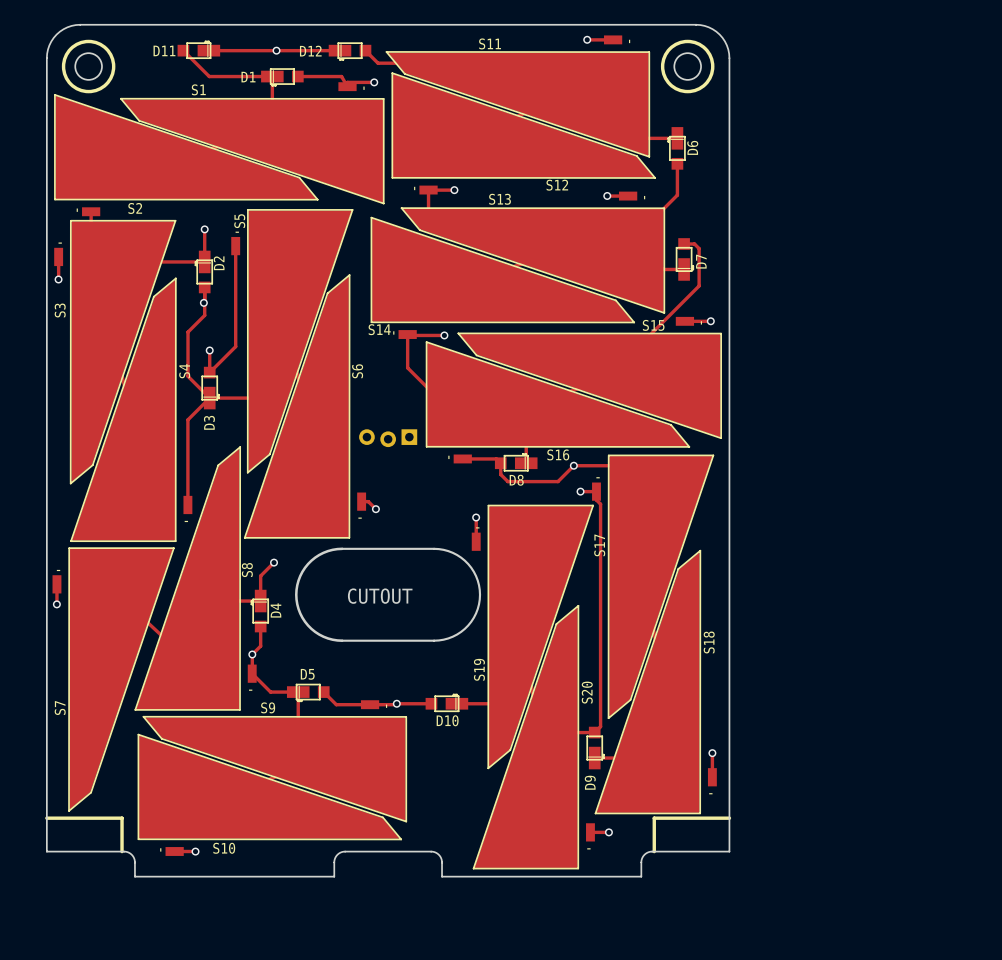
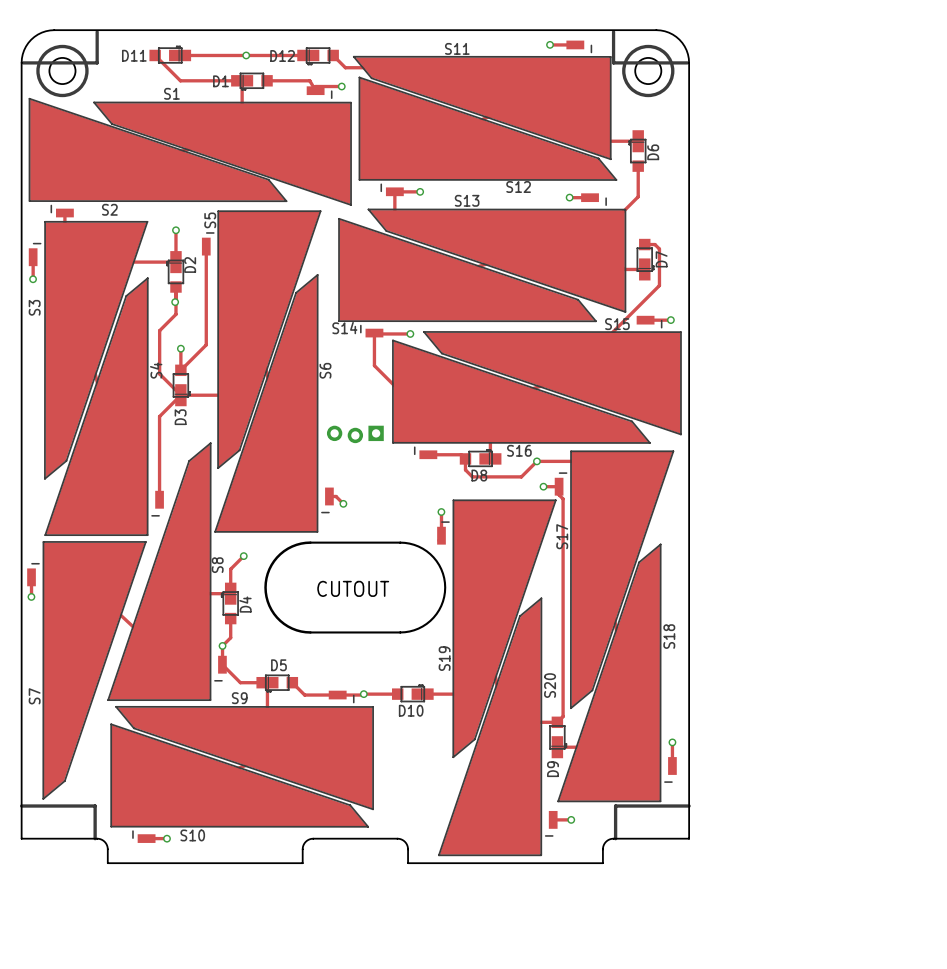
line: none -> (97, 31) (97, 62) (23, 62)
line: none -> (613, 31) (613, 62) (687, 62)

